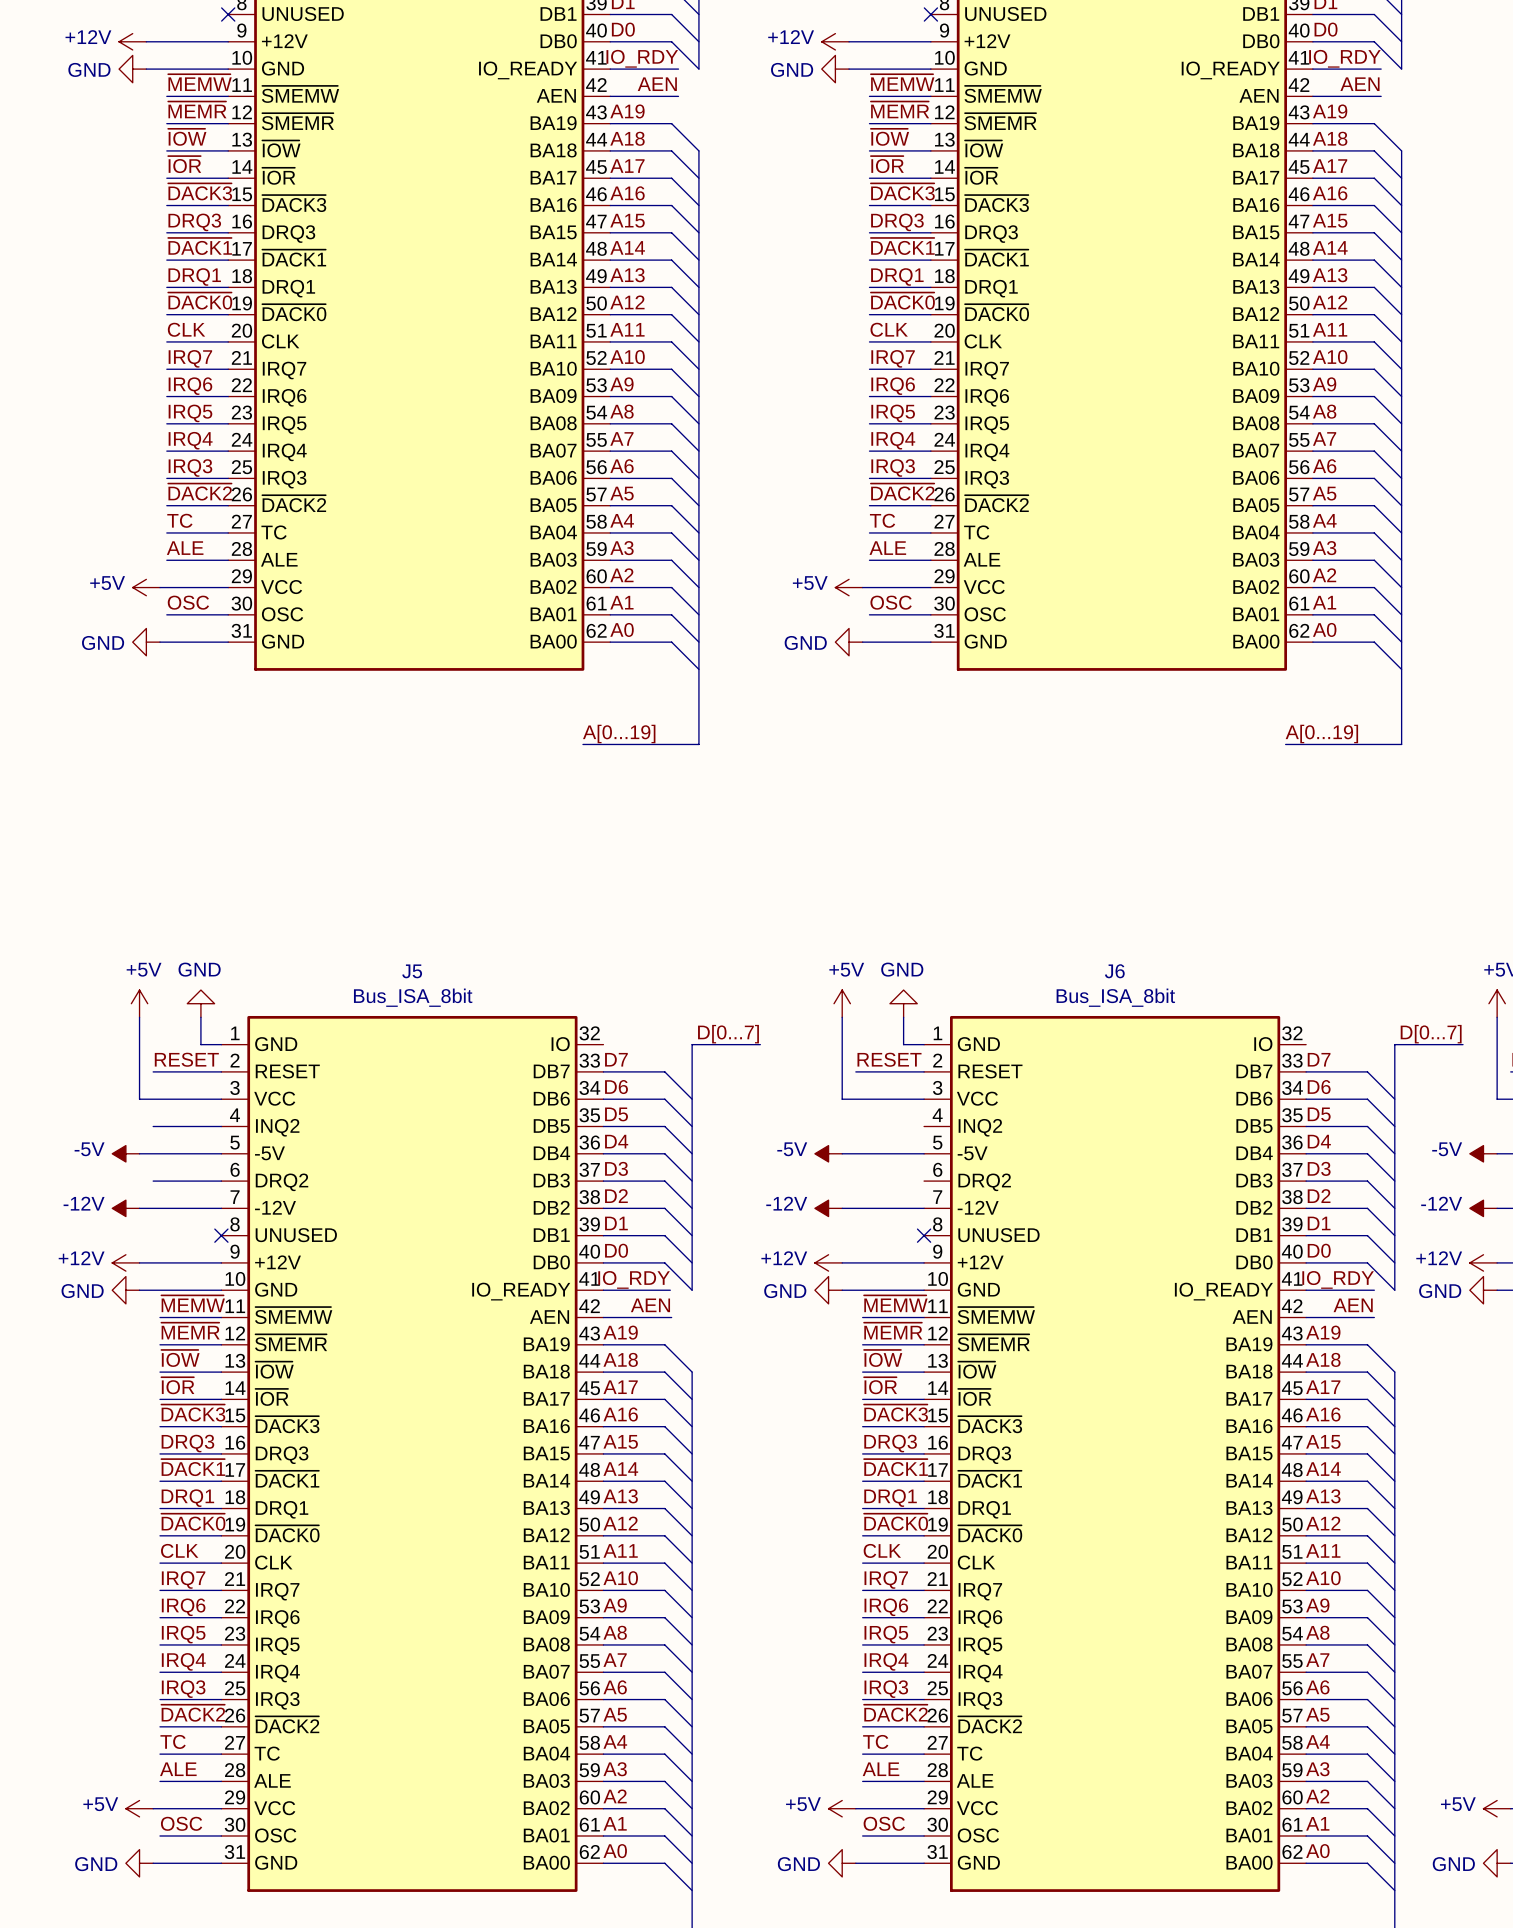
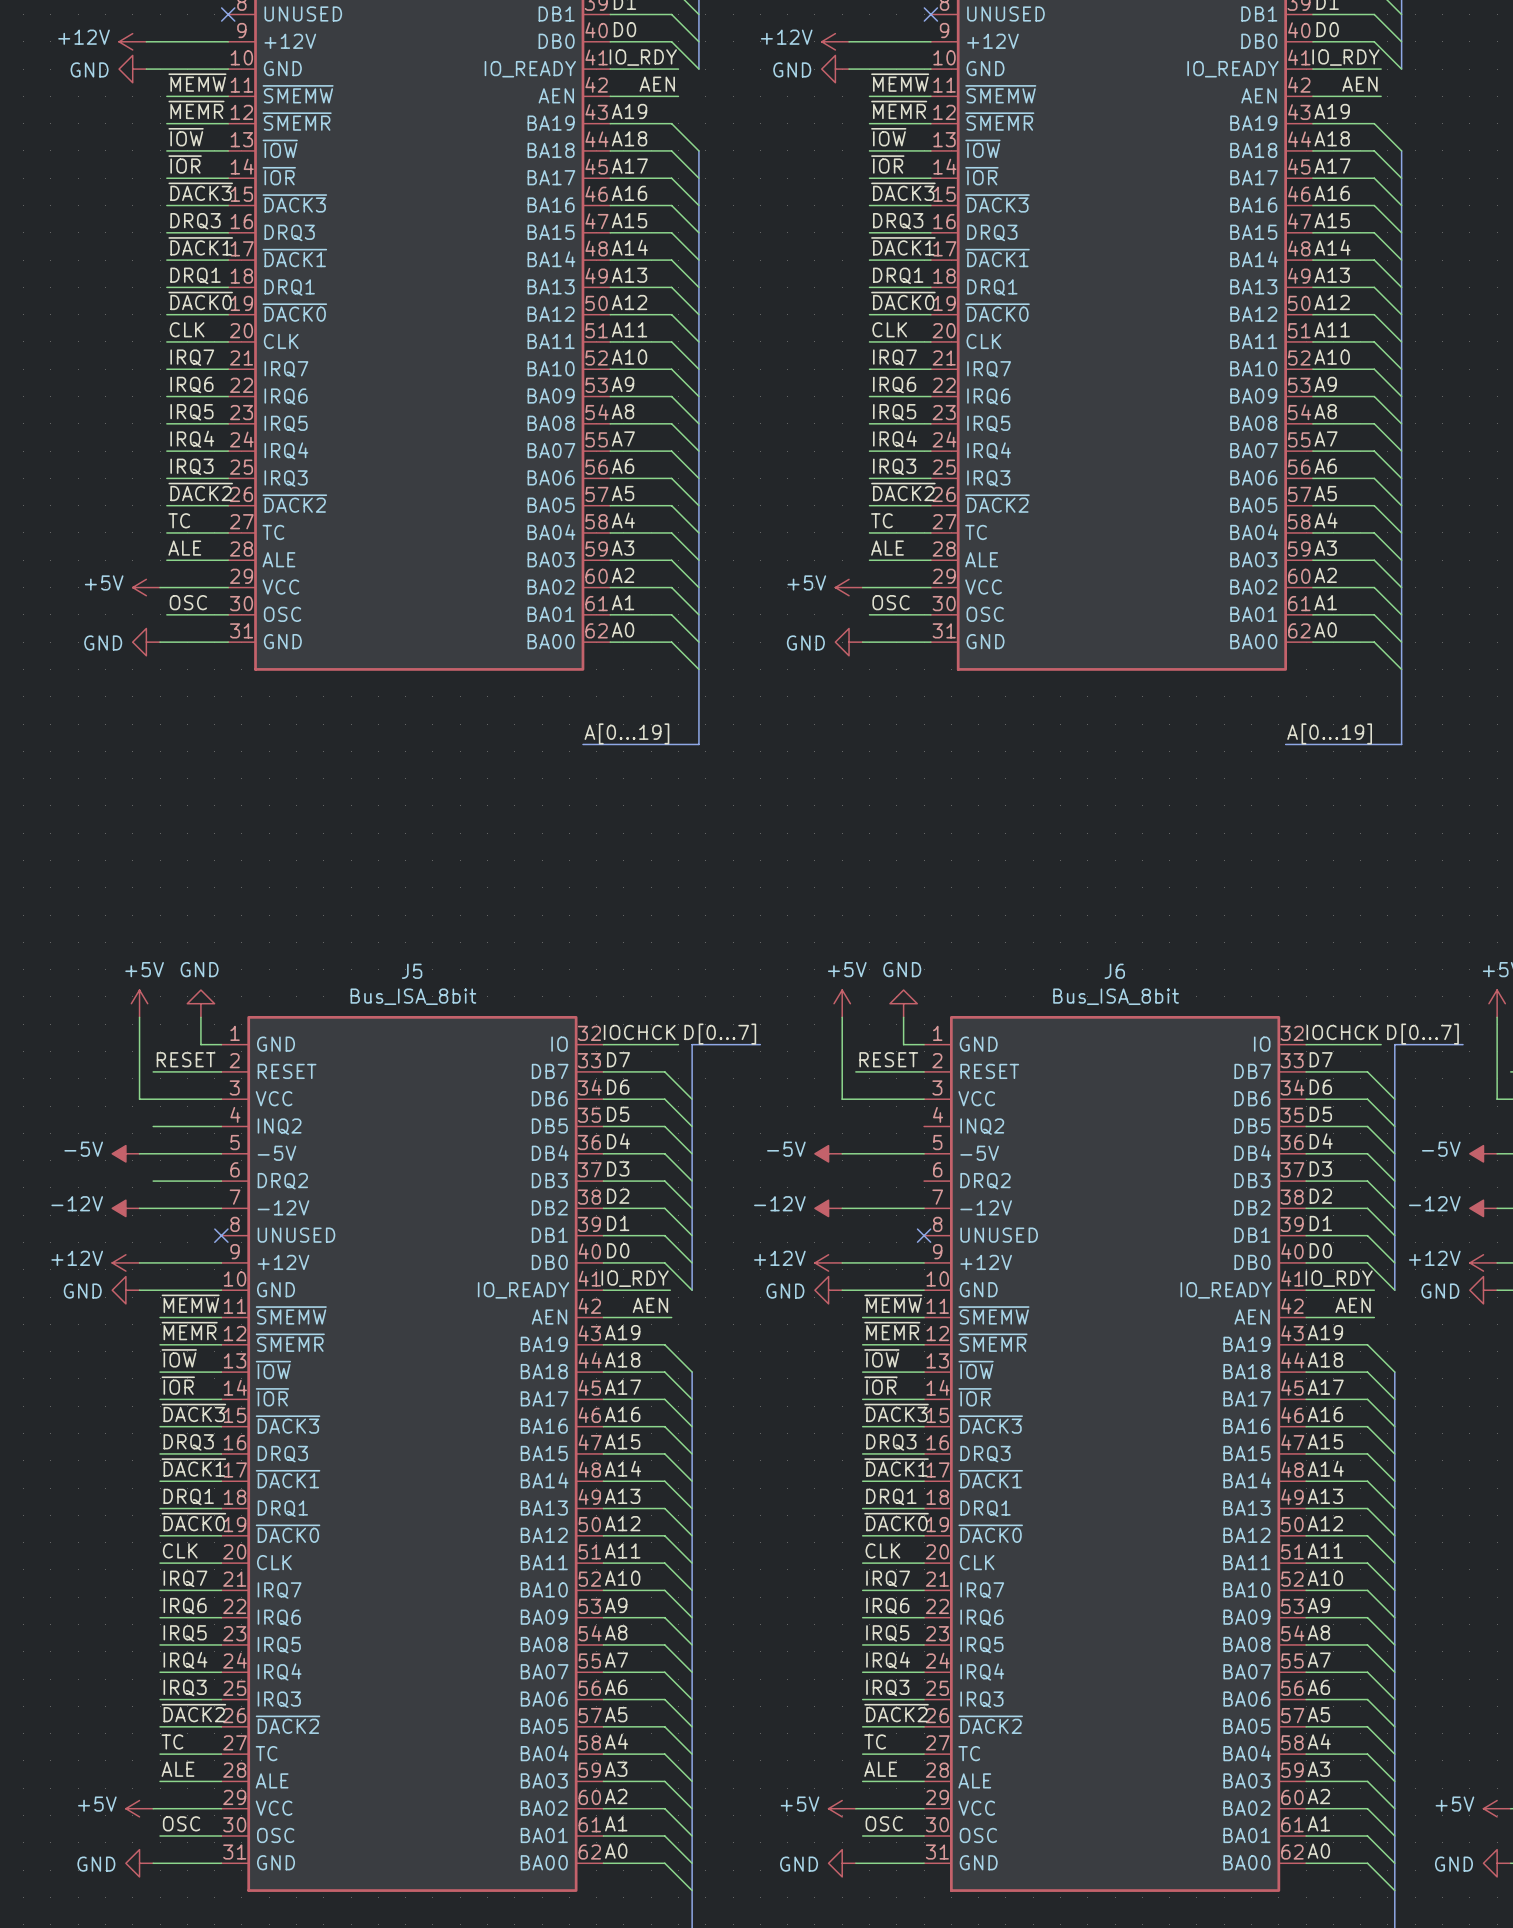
label: none -> IOCHCK (639, 1032)
label: none -> IOCHCK (1342, 1032)
wire: none -> (603, 1044) (678, 1044)
wire: none -> (1306, 1044) (1381, 1044)

